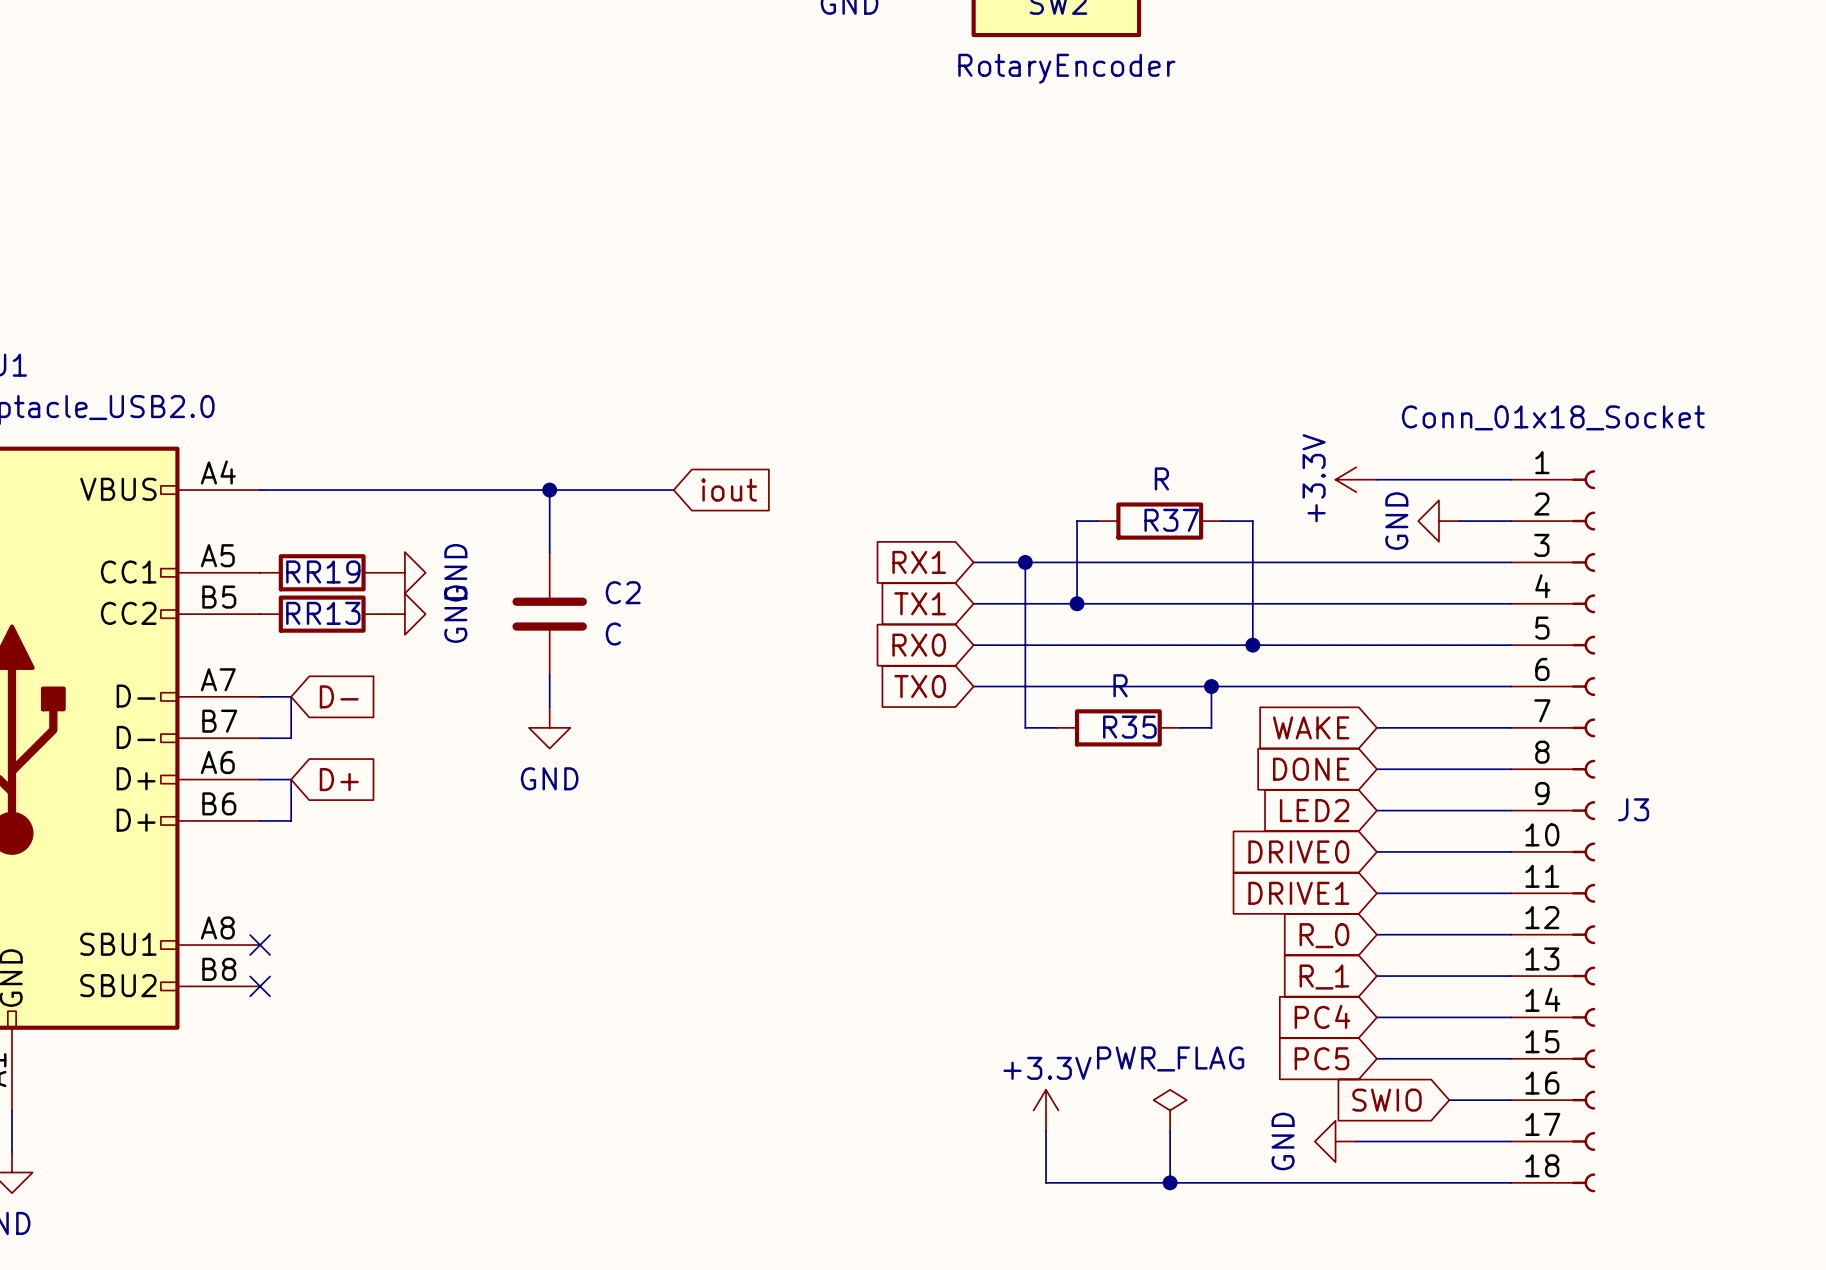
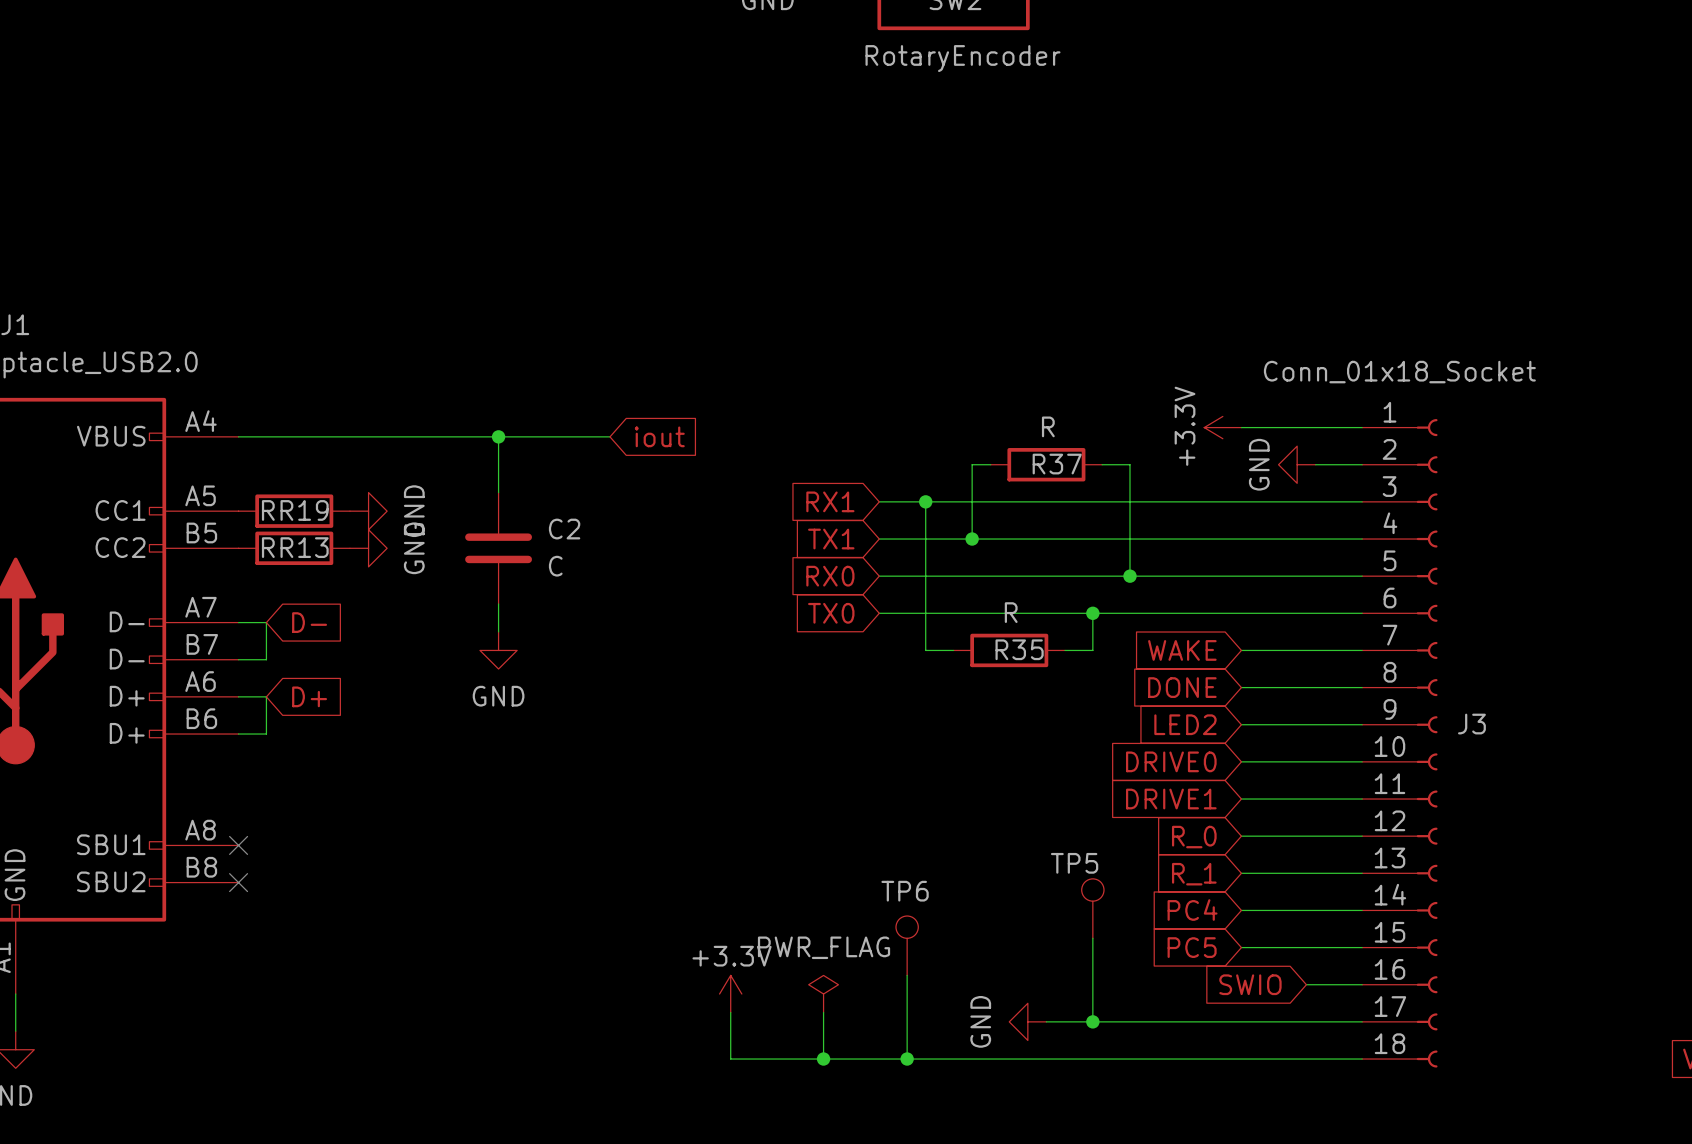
TP5: none -> (1092, 908)
wire: none -> (1092, 938) (1092, 1021)
TP6: none -> (907, 945)
wire: none -> (907, 975) (907, 1059)
power symbol position: +3.3V (1046, 1110) -> +3.3V (730, 994)
power symbol position: PWR_FLAG (1170, 1110) -> PWR_FLAG (823, 994)
wire: (1046, 1131) (1046, 1182) -> (730, 1012) (730, 1059) (944, 1059)
wire: (1170, 1131) (1170, 1182) -> (823, 1012) (823, 1059)
wire: none -> (1046, 1021) (1222, 1021)
power symbol position: GND (1335, 1141) -> GND (1027, 1021)
junction: none -> (823, 1059)
junction: none -> (907, 1059)
junction position: (1170, 1182) -> (1092, 1021)

